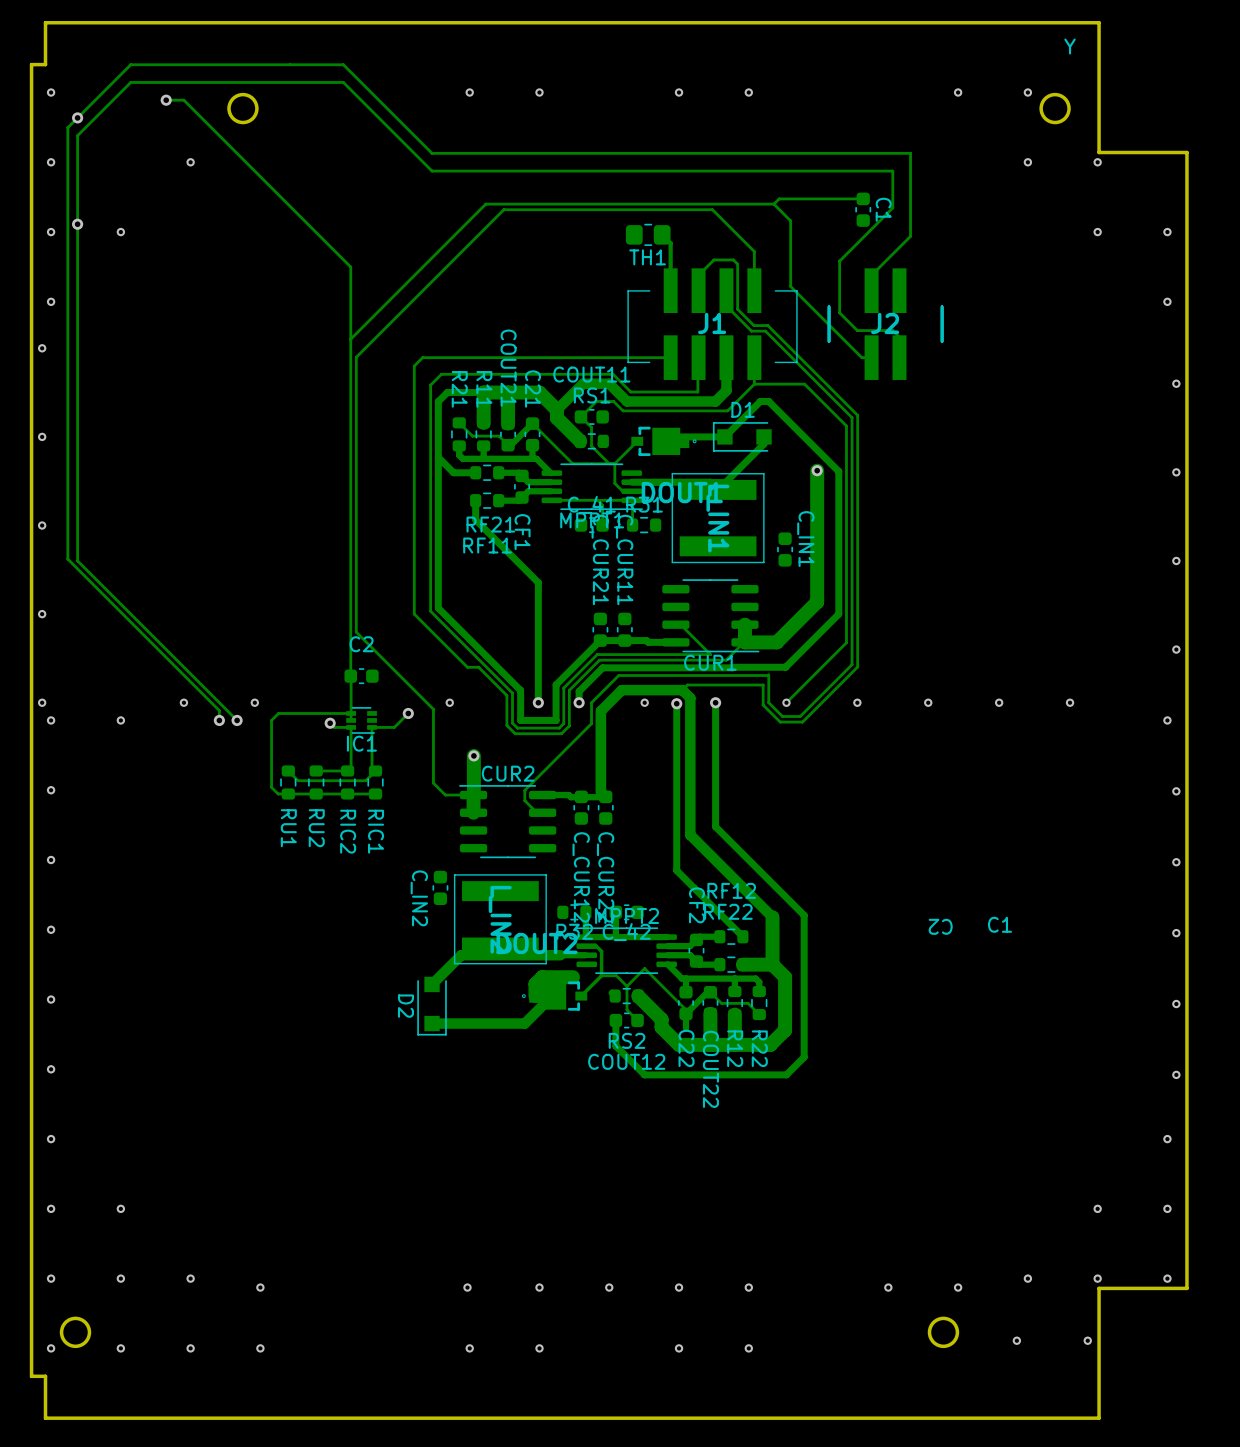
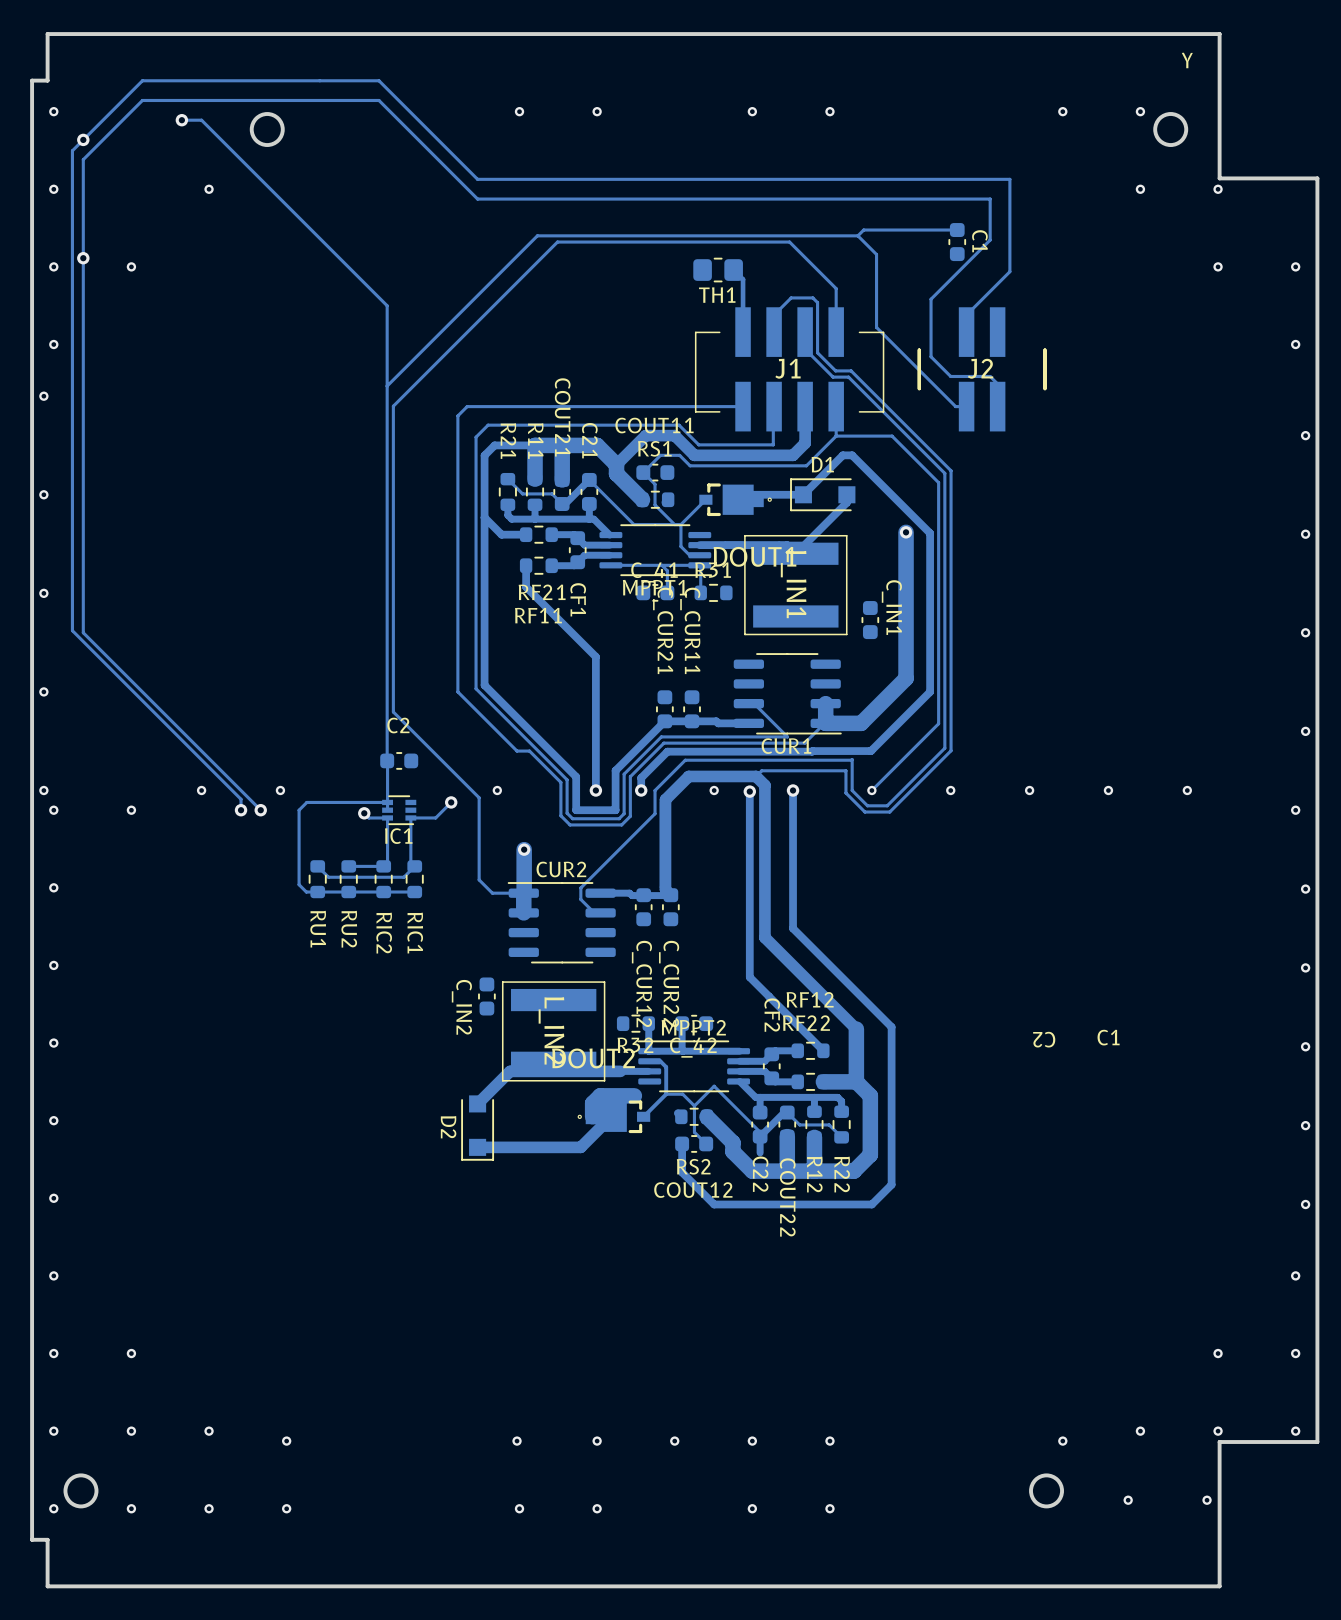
via: (888, 1287) -> none

